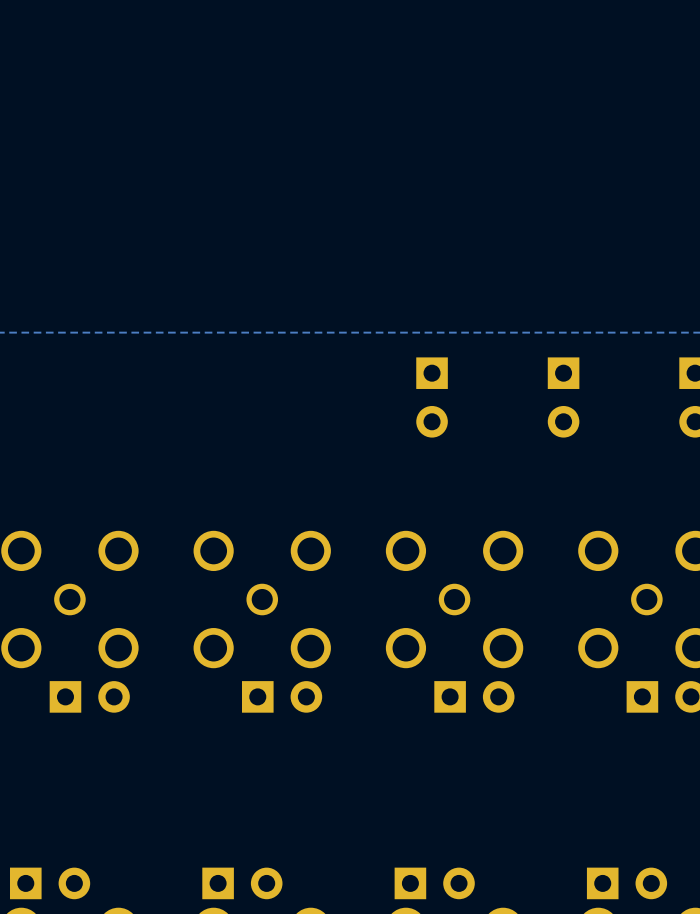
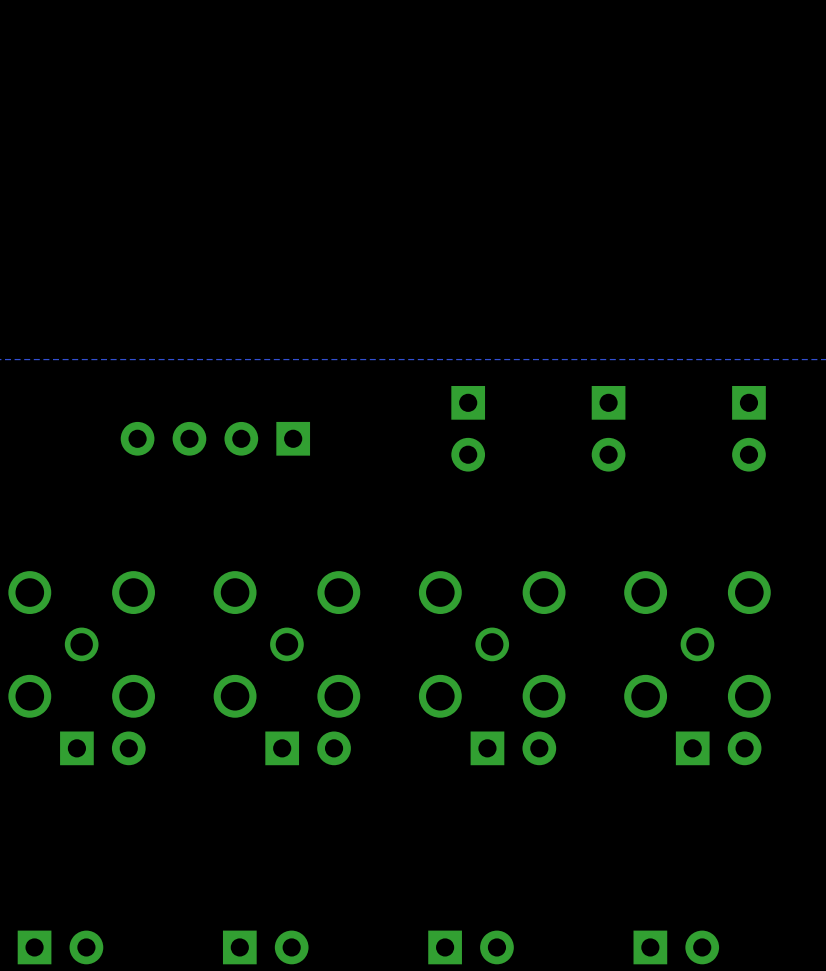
part: none -> (215, 438)

